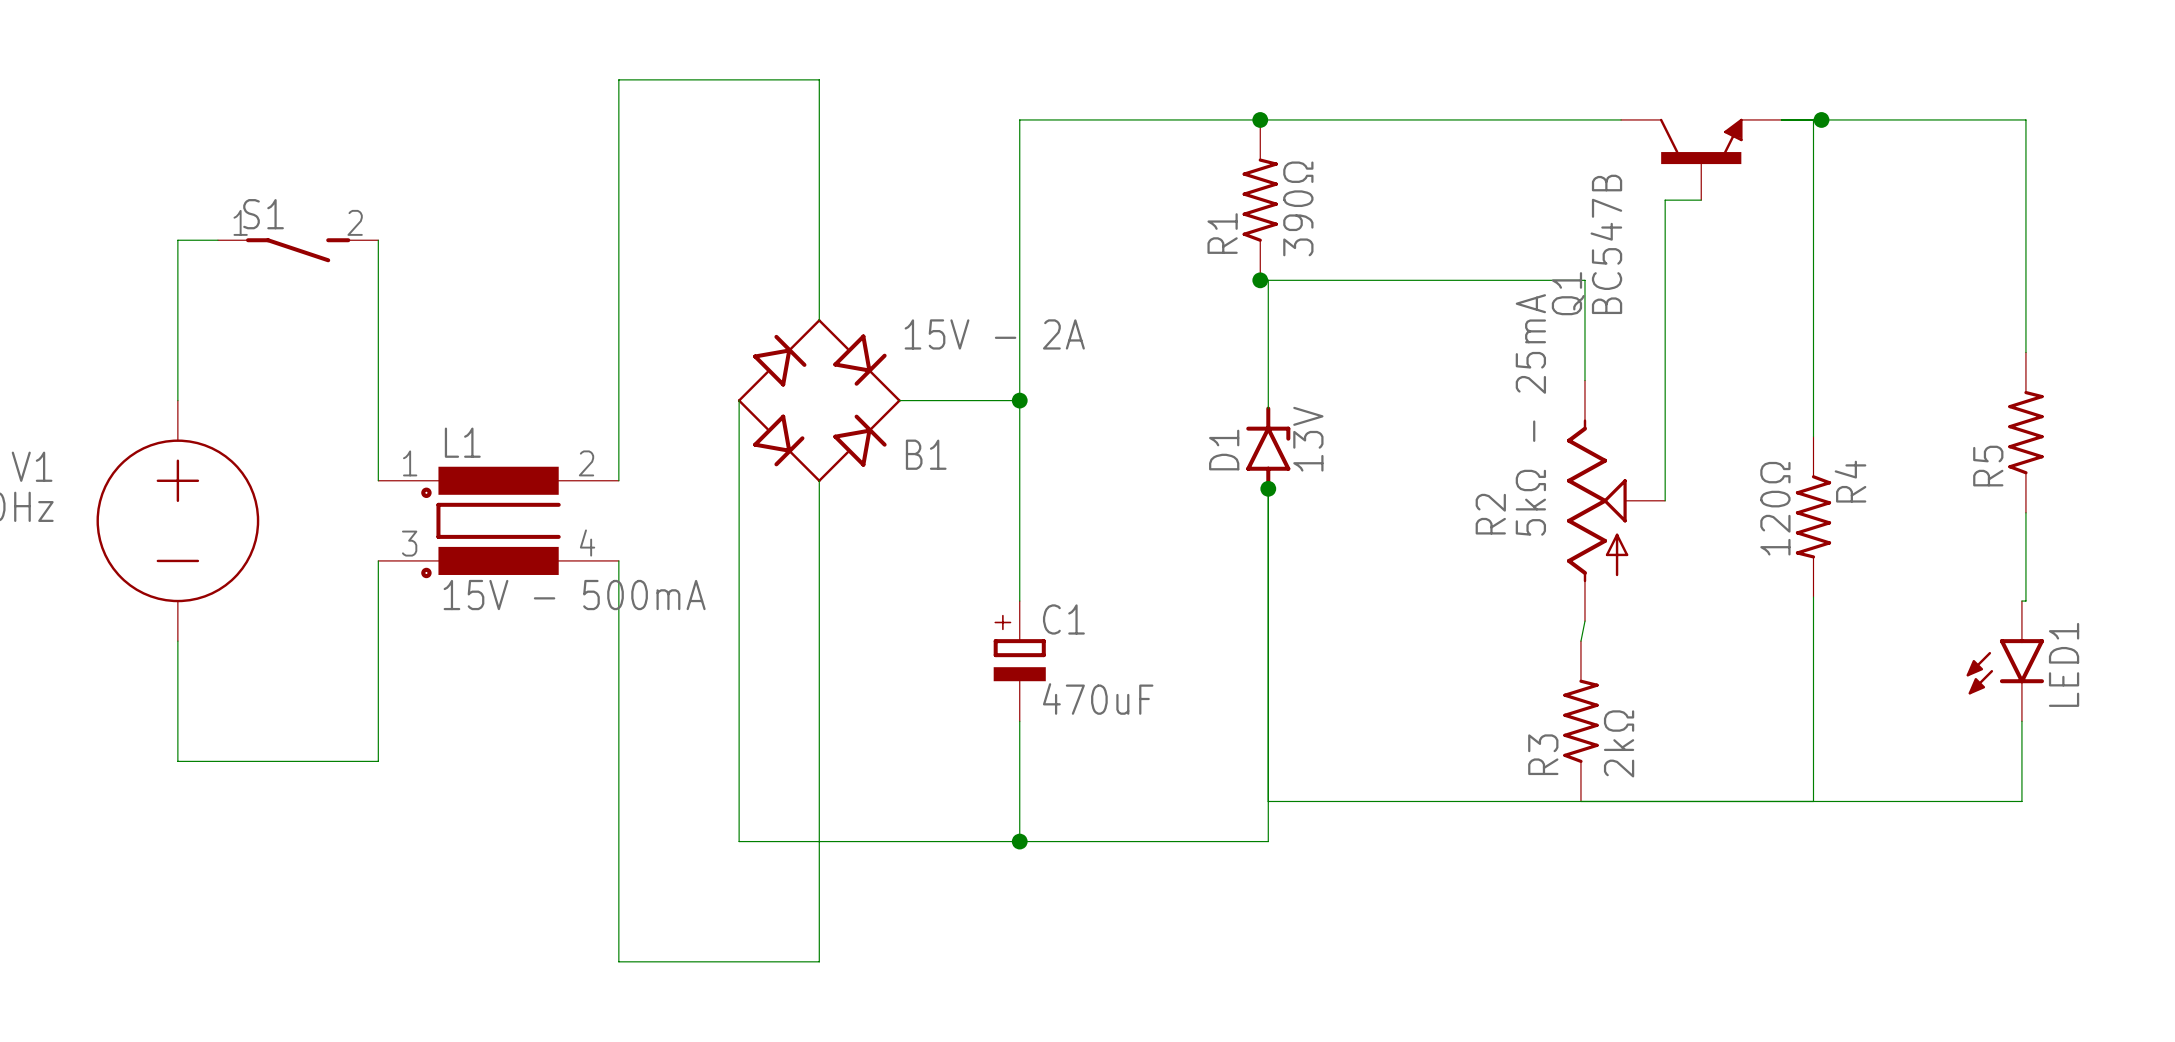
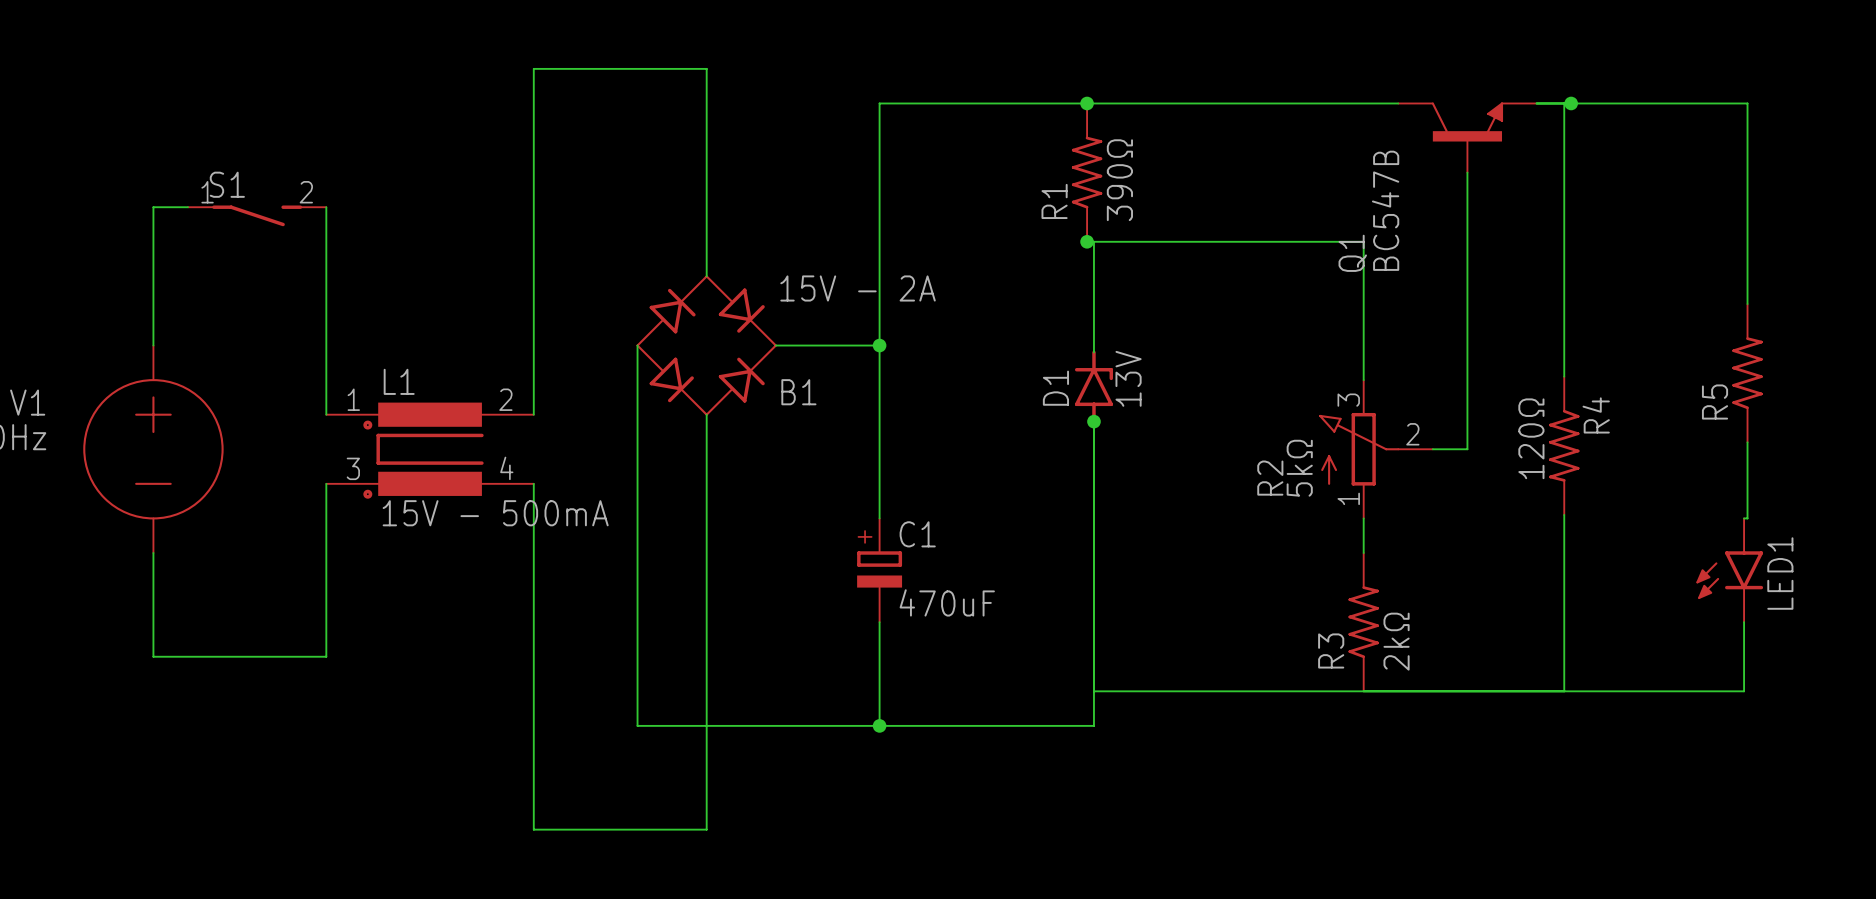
wire: (1701, 200) (1665, 200) (1665, 500) -> (1467, 172) (1467, 449) (1432, 449)
wire: (1580, 280) (1584, 280) (1584, 380) -> (1363, 241) (1363, 380)
R2 symbol: [1566, 380, 1666, 622] -> [1319, 380, 1433, 519]
R2 value: 5kΩ - 25mA (1530, 414) -> 5kΩ (1299, 468)
wire: (1584, 621) (1580, 641) -> (1363, 518) (1363, 553)

